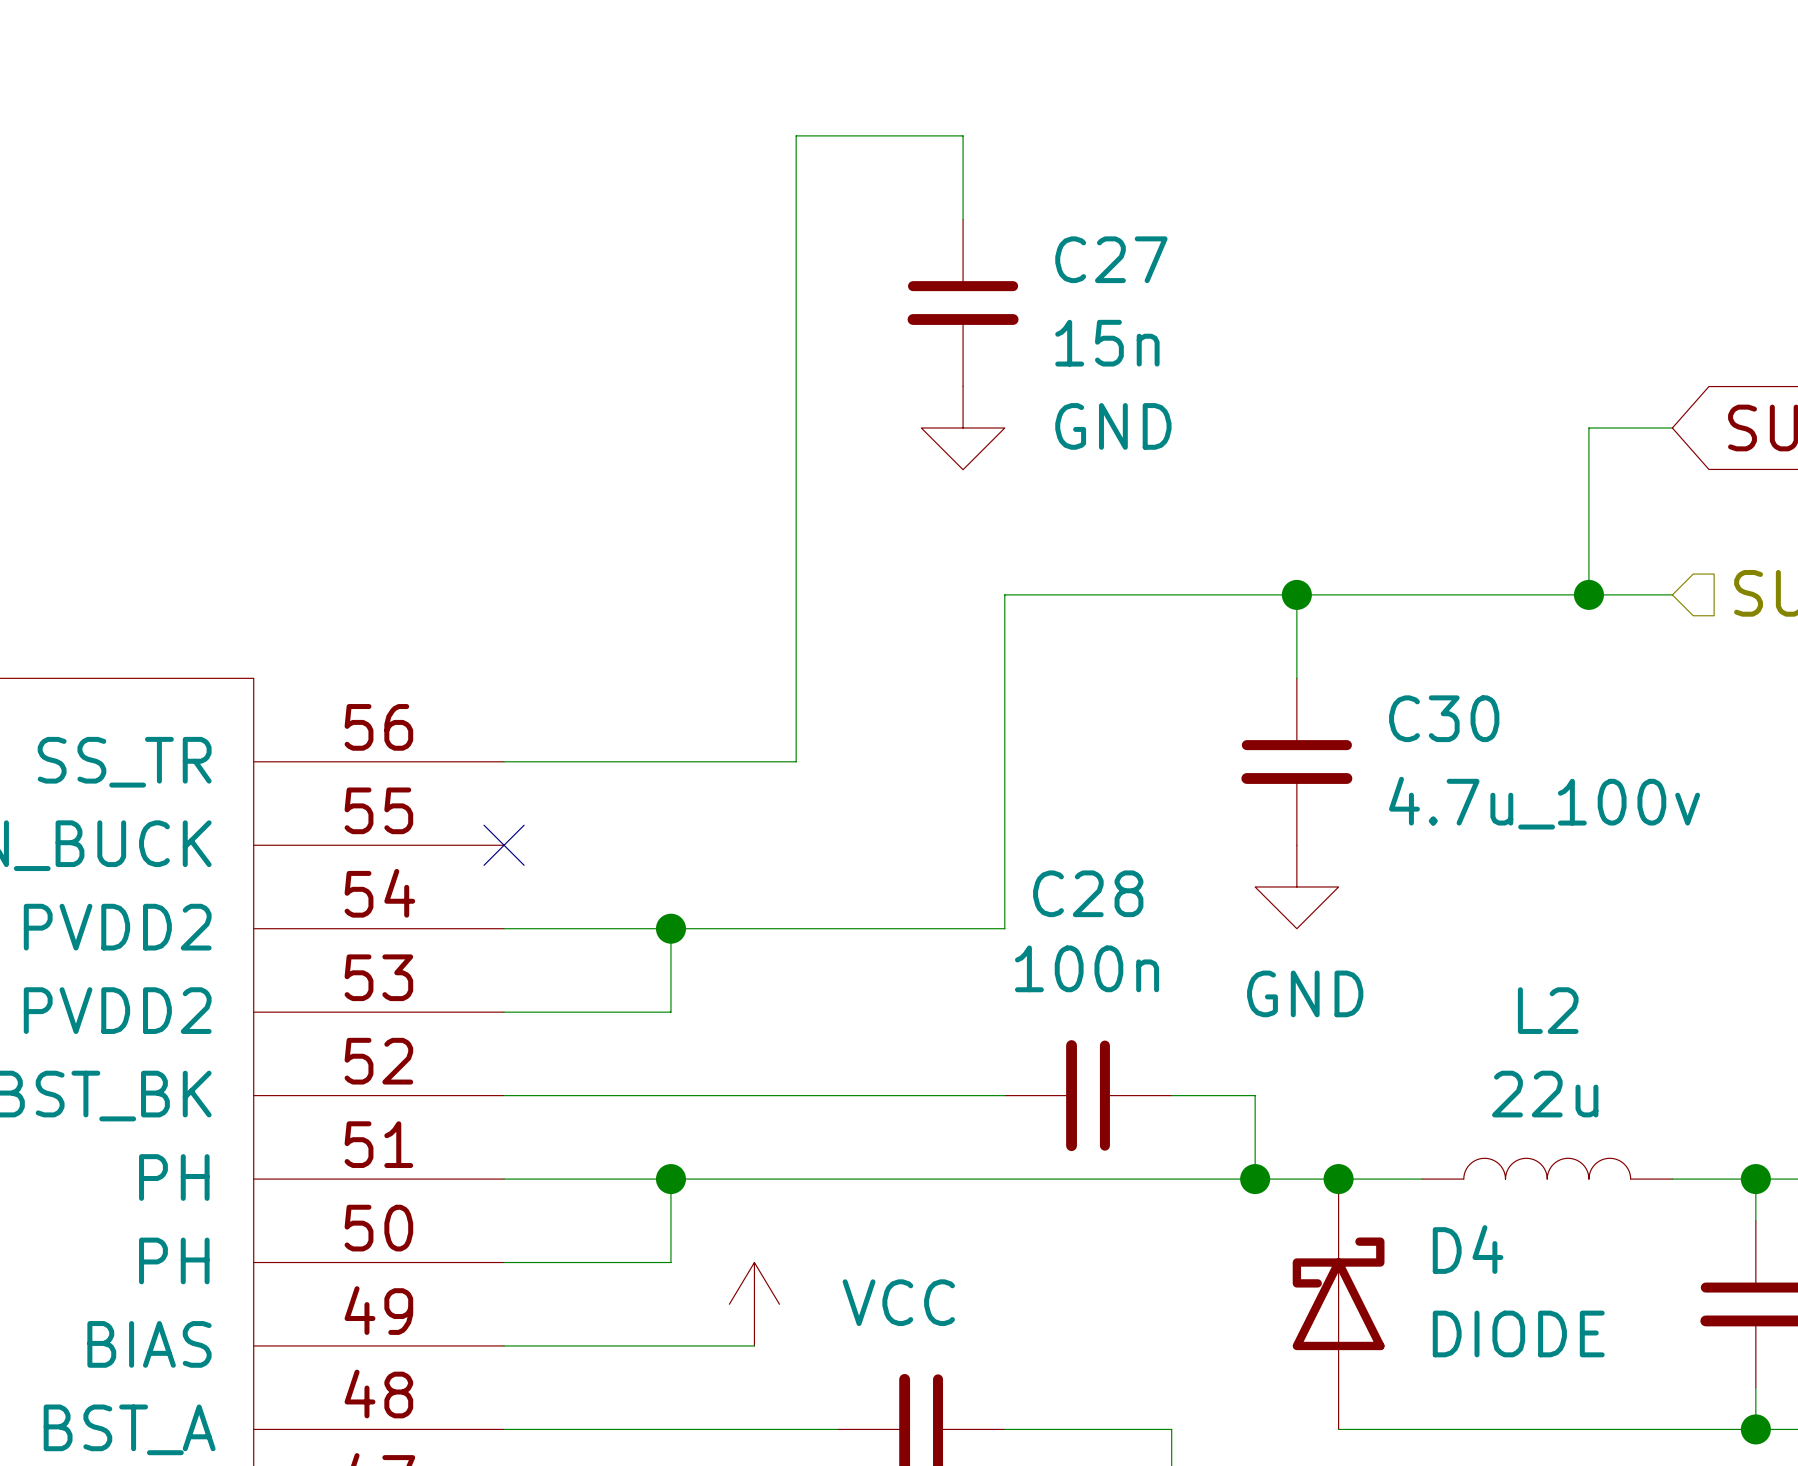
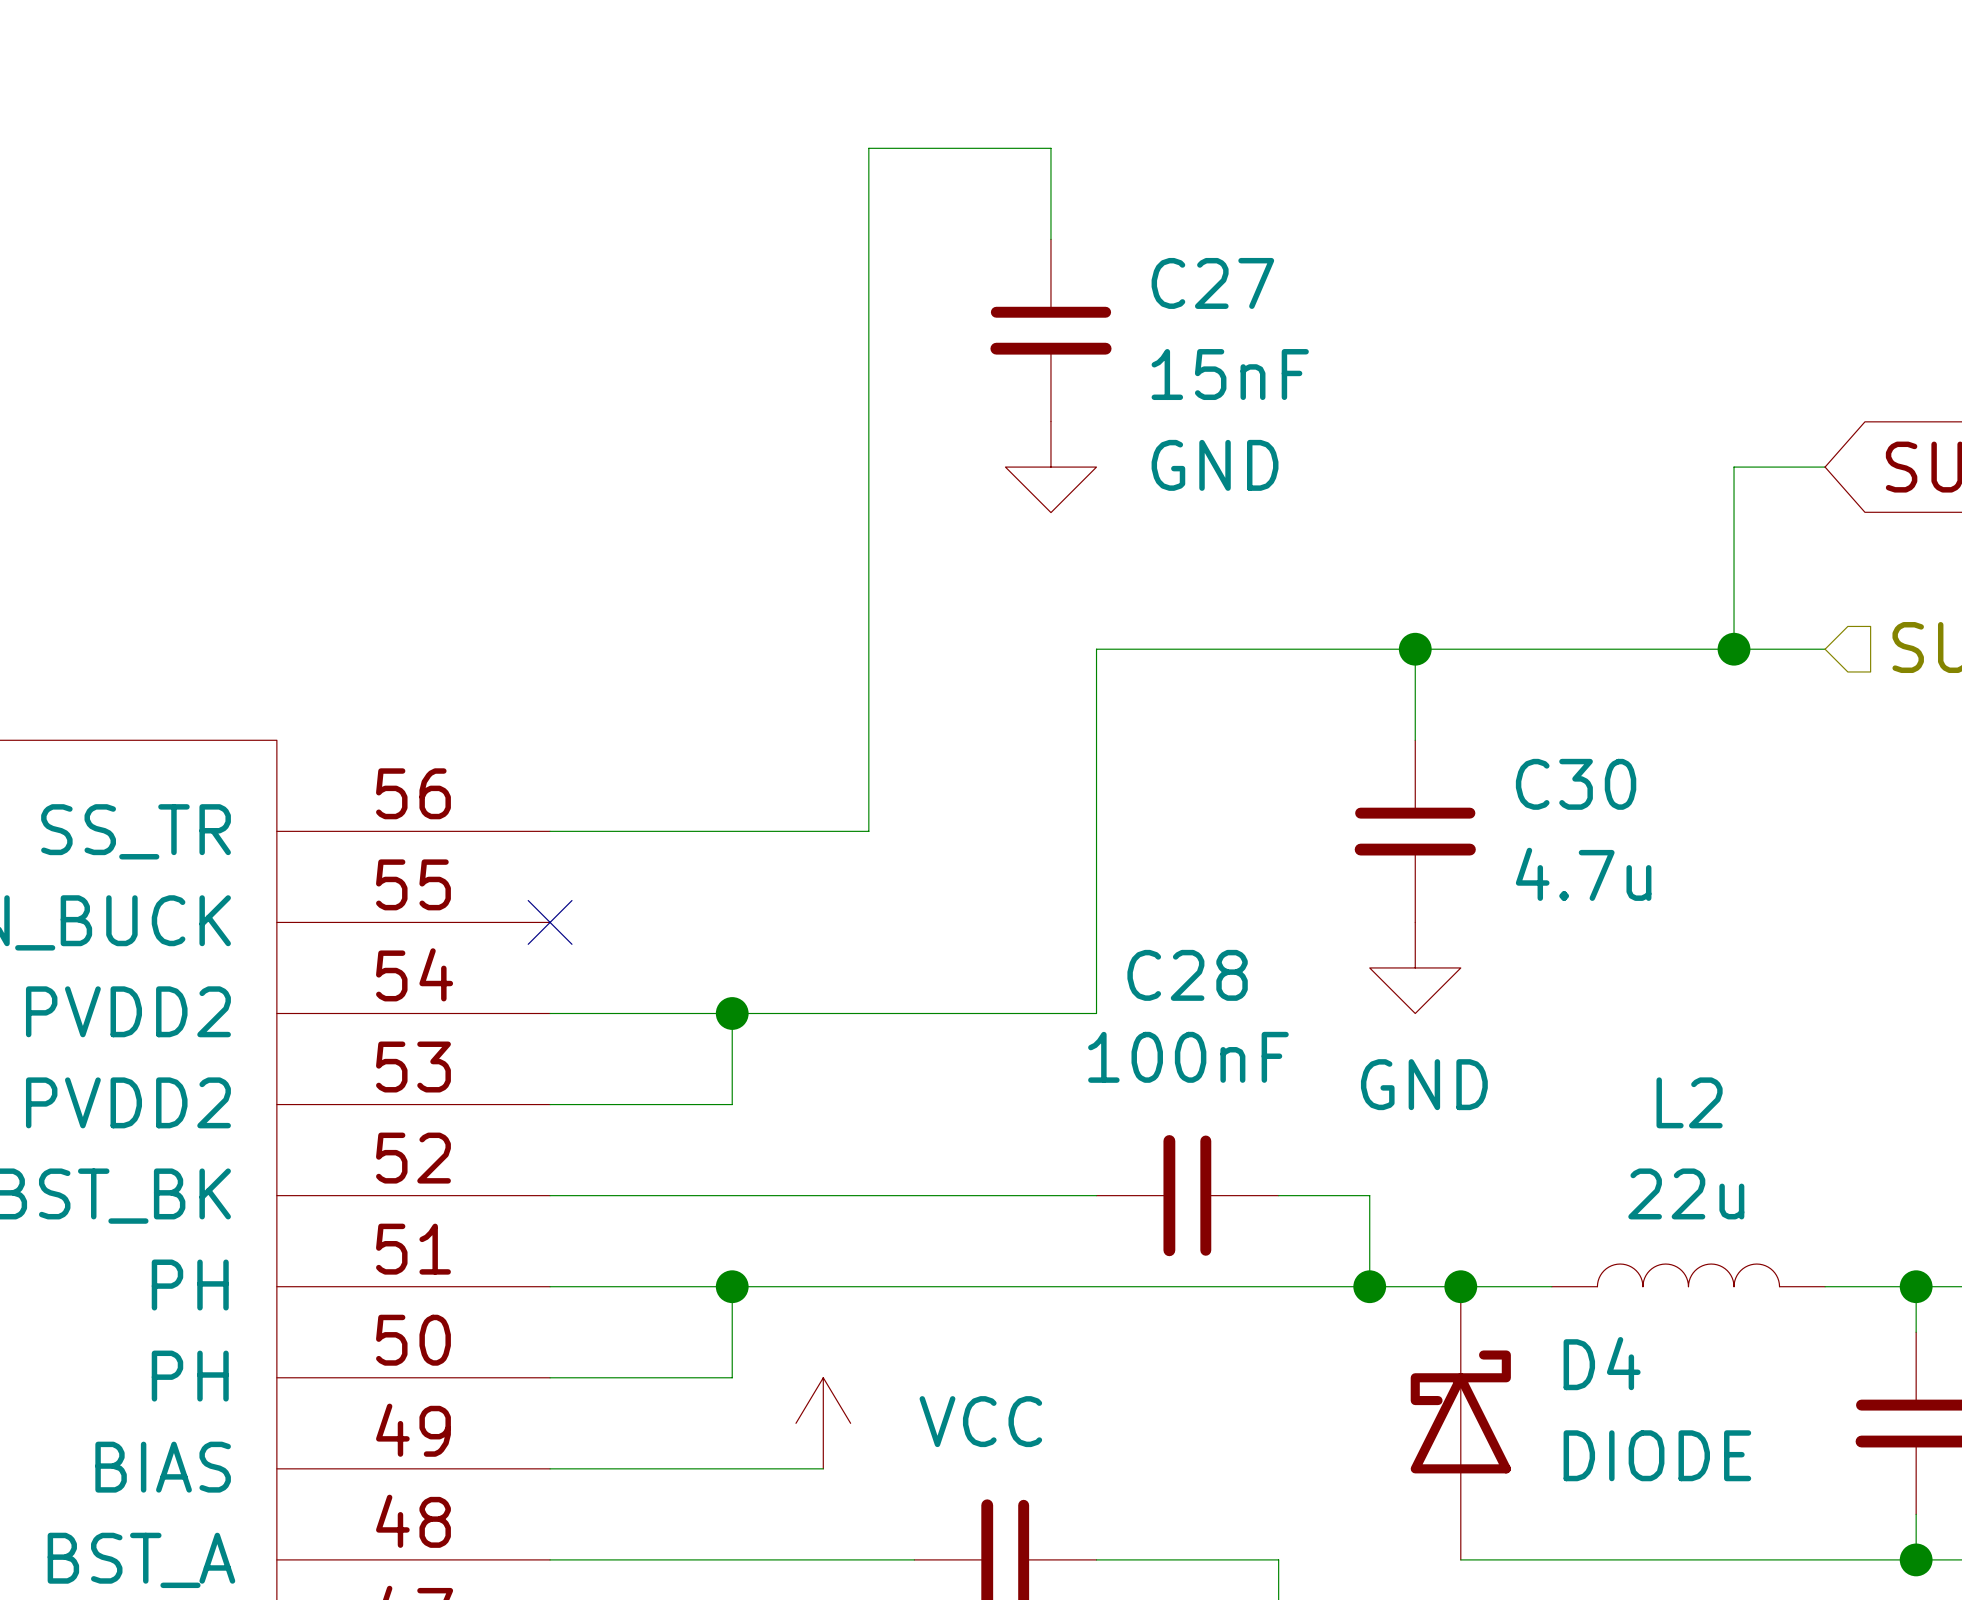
C27 value: 15n (1107, 343) -> 15nF (1230, 374)
C30 value: 4.7u_100v (1544, 803) -> 4.7u (1583, 874)
C28 value: 100n (1087, 968) -> 100nF (1188, 1057)

